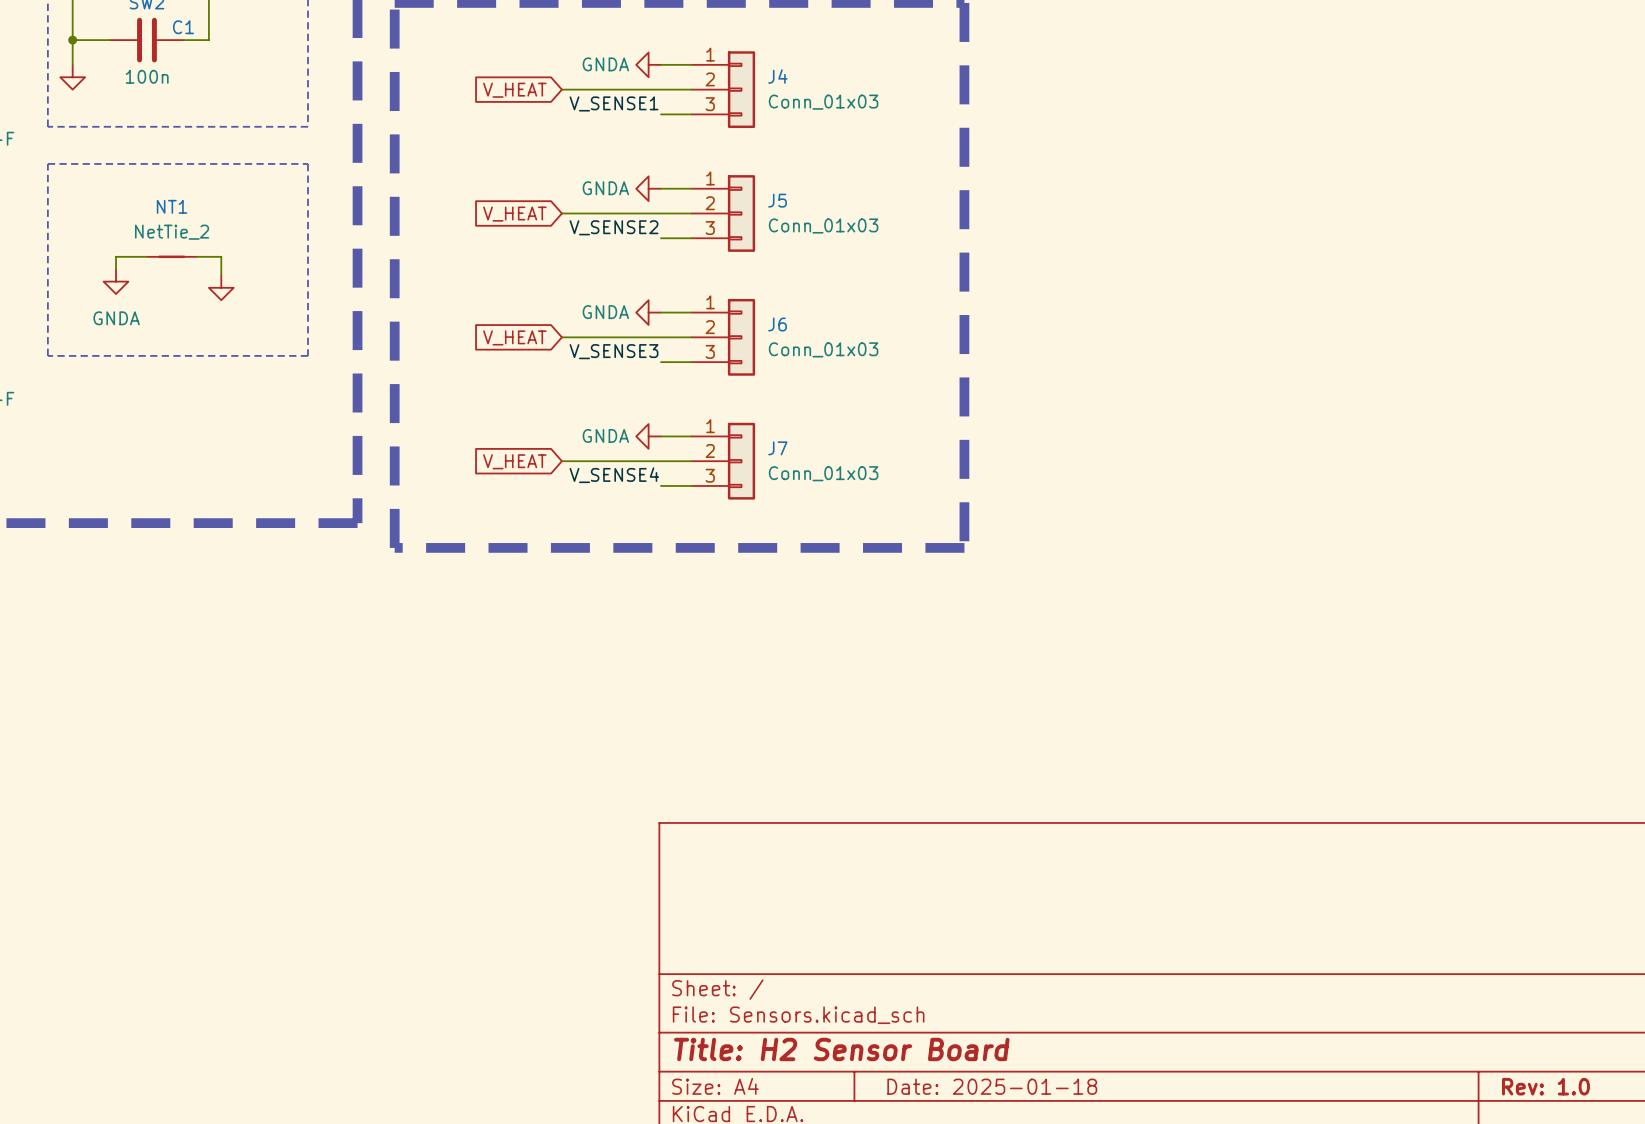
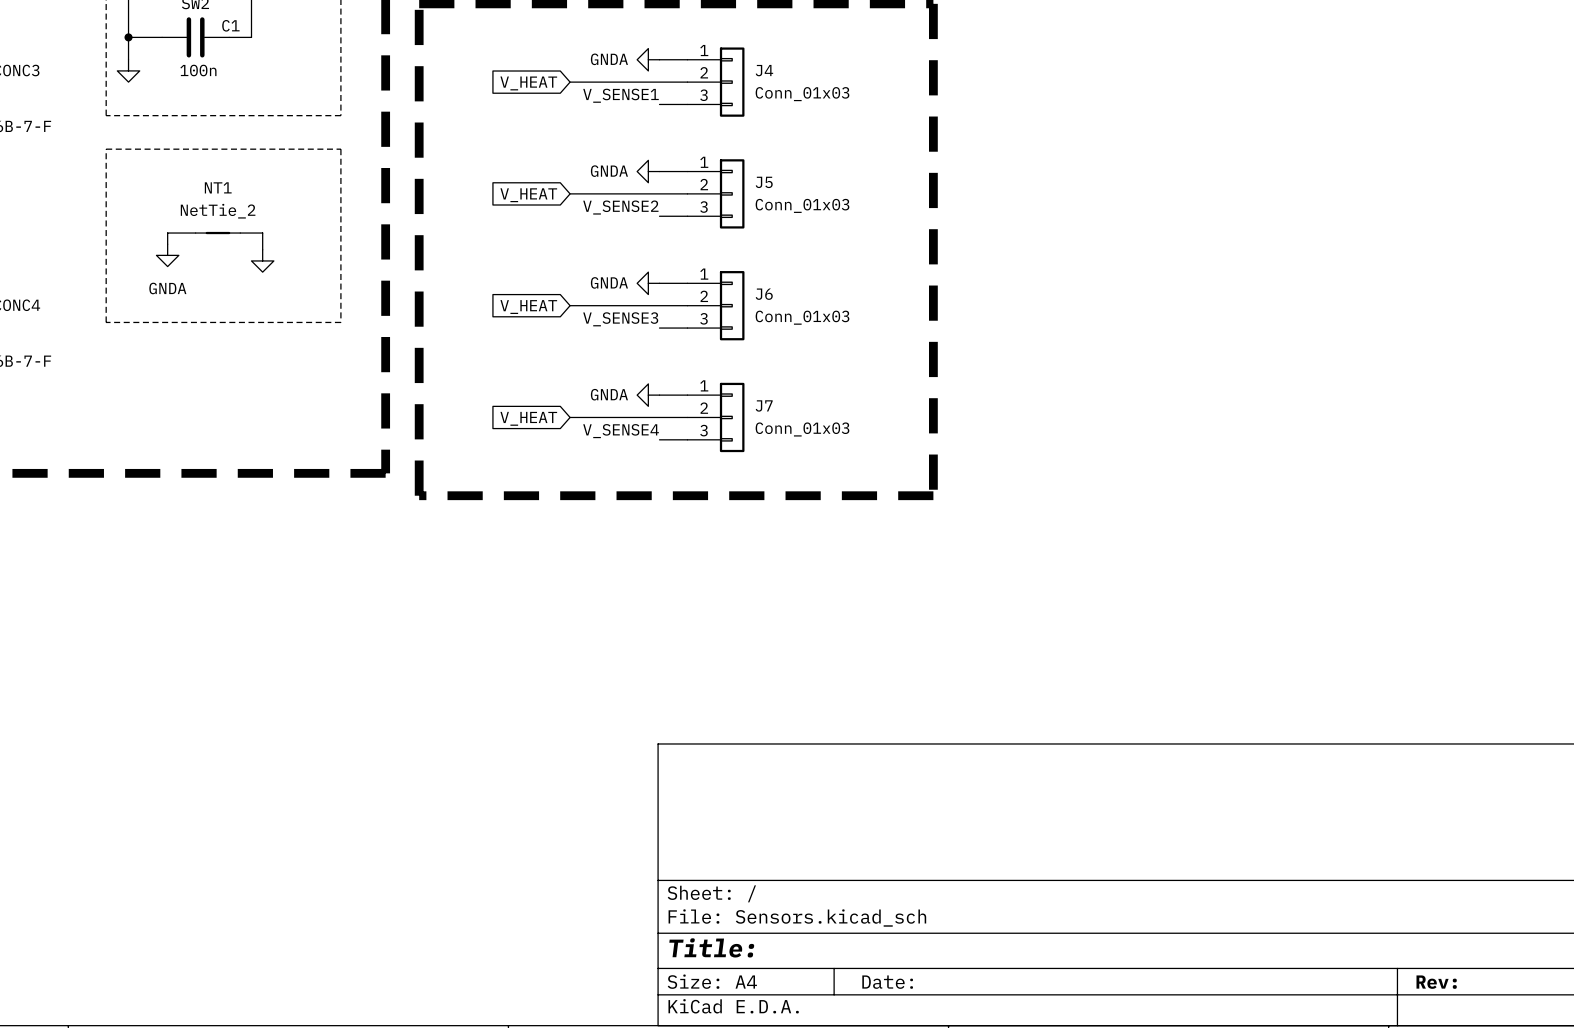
title block: Title: H2 Sensor Board (841, 1049) -> Title: (711, 947)
title block: Date: 2025-01-18 (992, 1086) -> Date: (887, 982)
title block: Rev: 1.0 (1545, 1086) -> Rev: (1436, 982)

